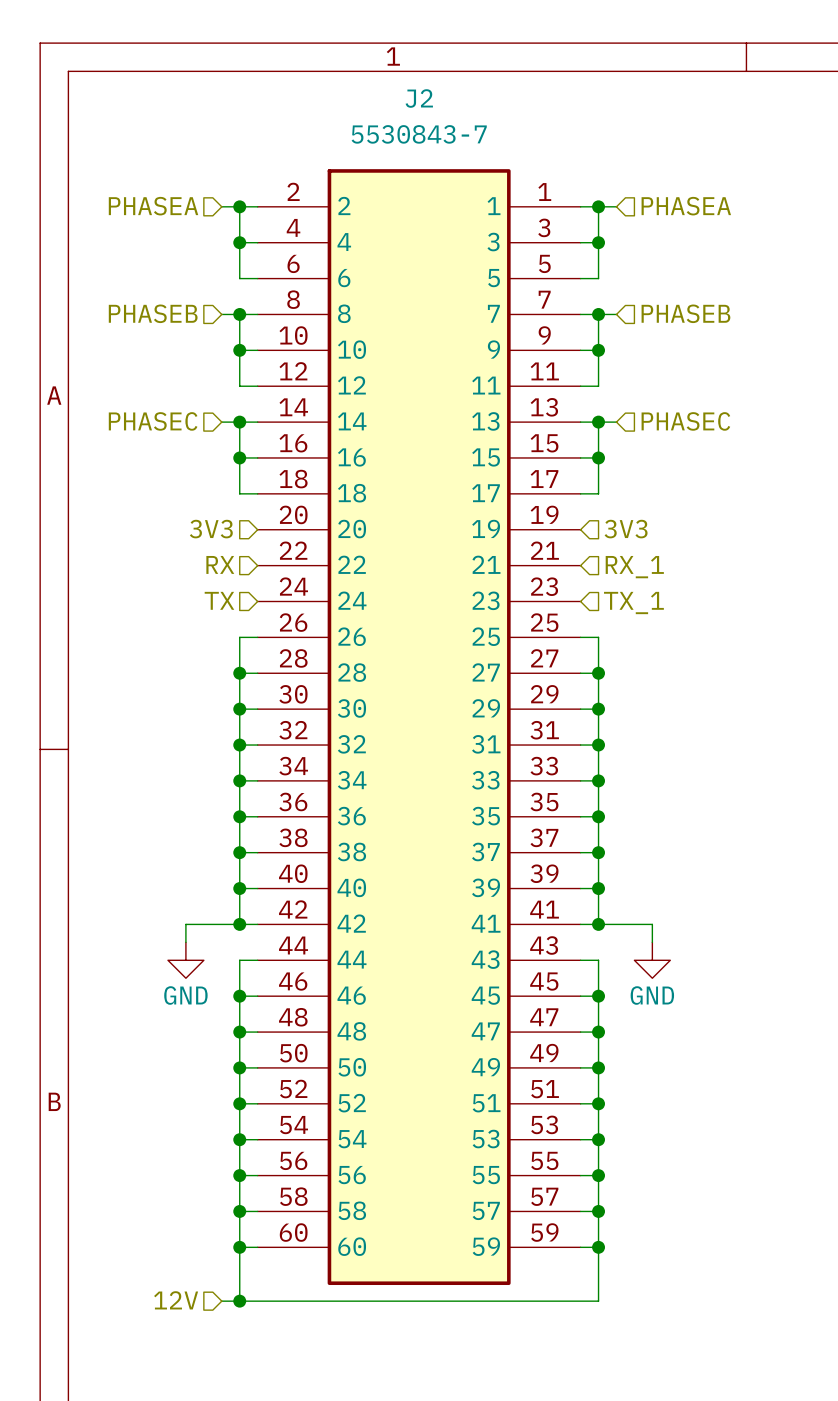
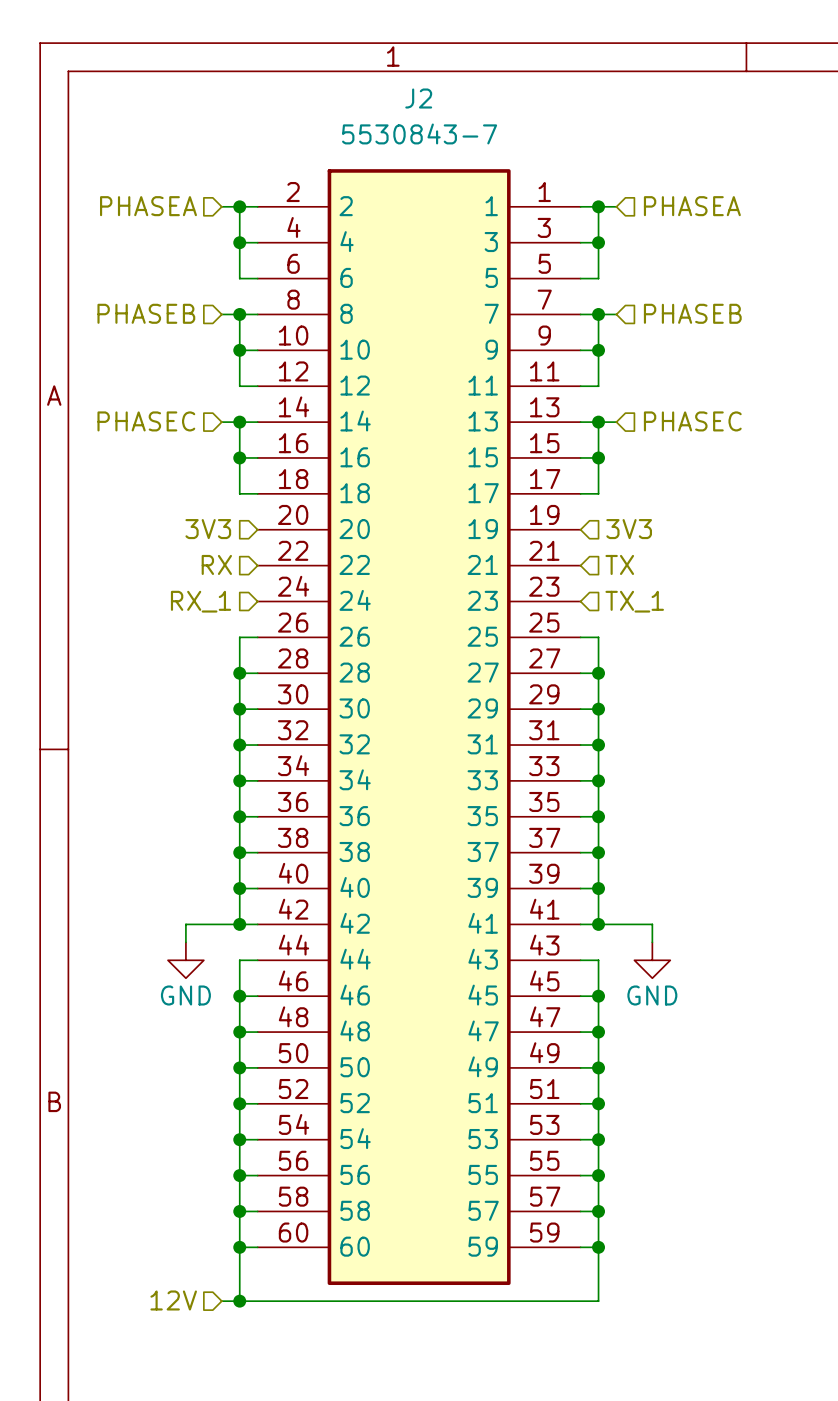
hierarchical label: RX_1 (634, 567) -> TX (619, 564)
hierarchical label: TX (219, 600) -> RX_1 (201, 601)

